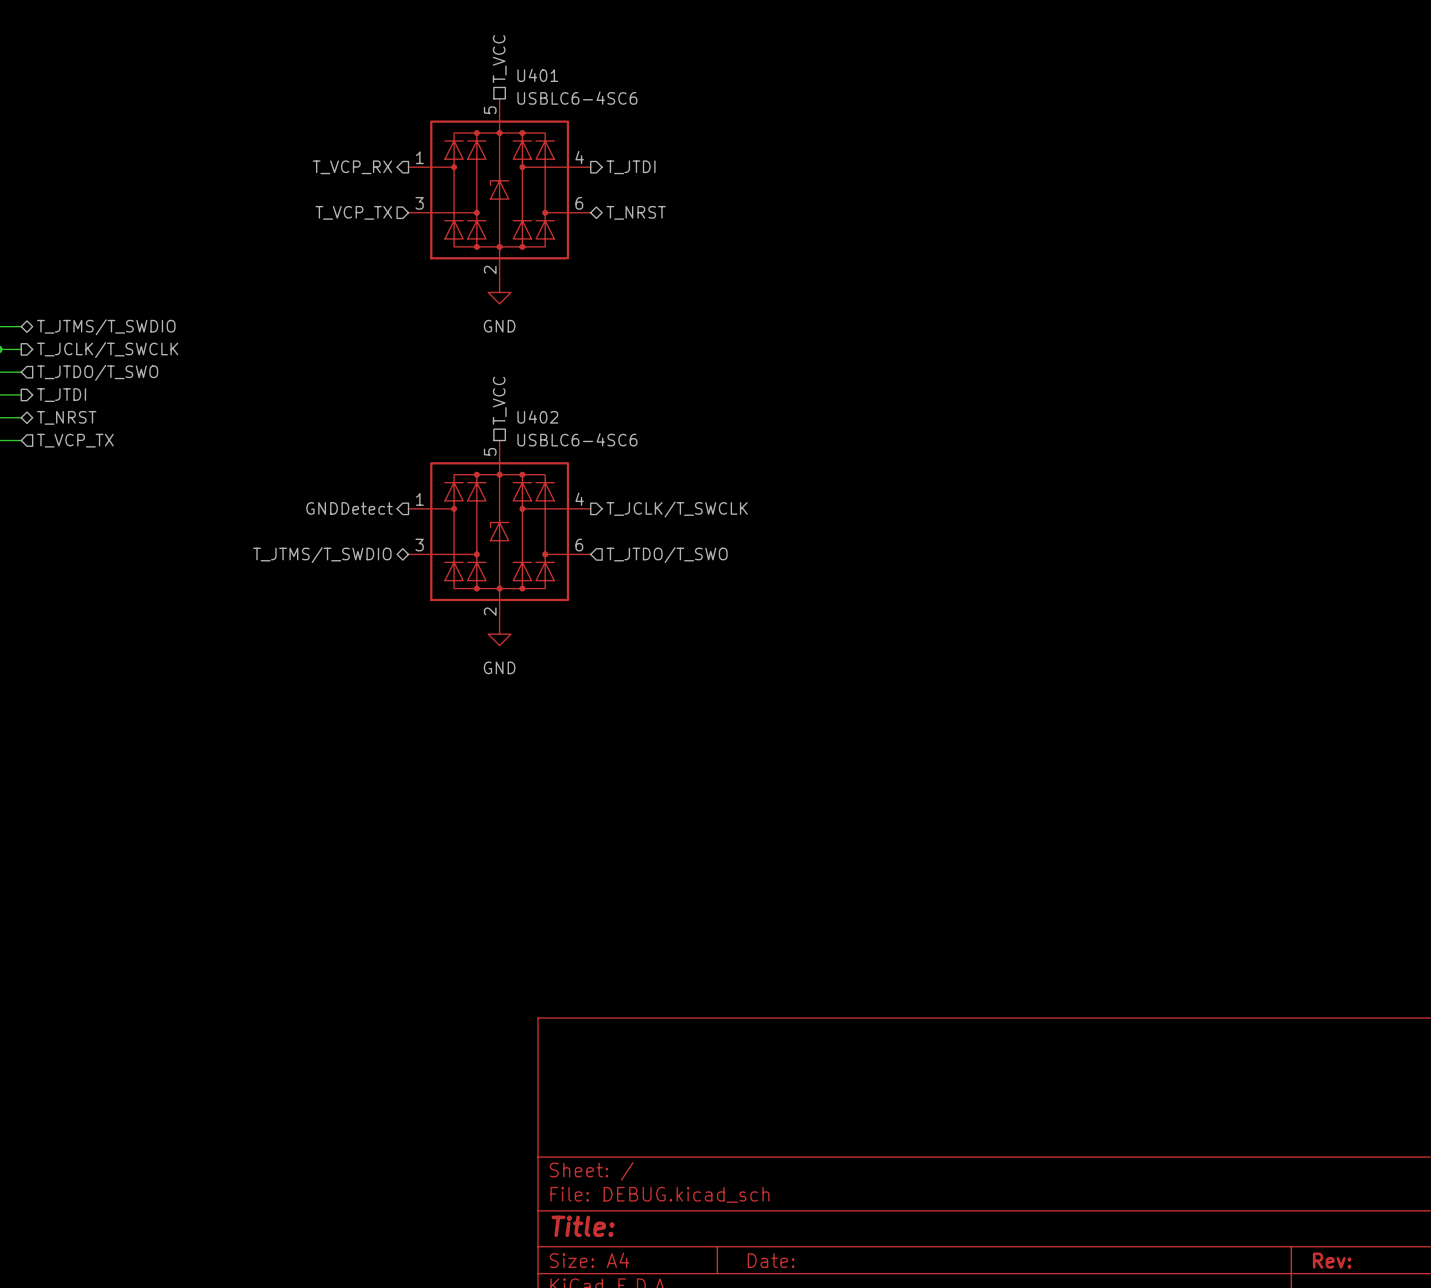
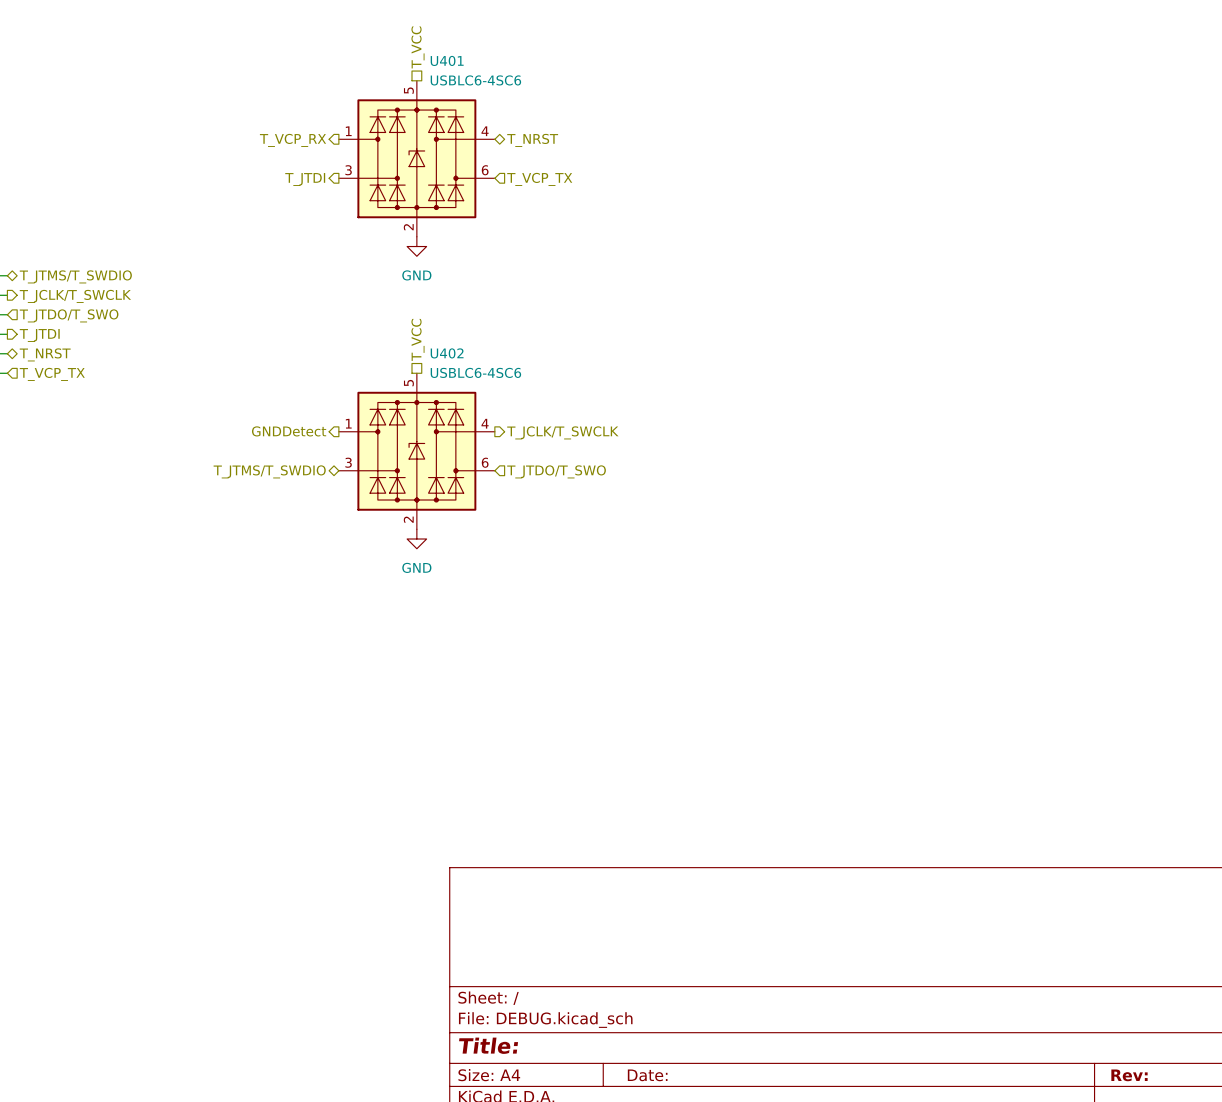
hierarchical label shape: output (631, 167) -> bidirectional (532, 140)
hierarchical label: T_JTDI (631, 167) -> T_NRST (532, 140)
hierarchical label shape: input (353, 212) -> output (305, 179)
hierarchical label: T_VCP_TX (353, 212) -> T_JTDI (305, 179)
hierarchical label shape: bidirectional (636, 212) -> input (539, 179)
hierarchical label: T_NRST (636, 212) -> T_VCP_TX (539, 179)

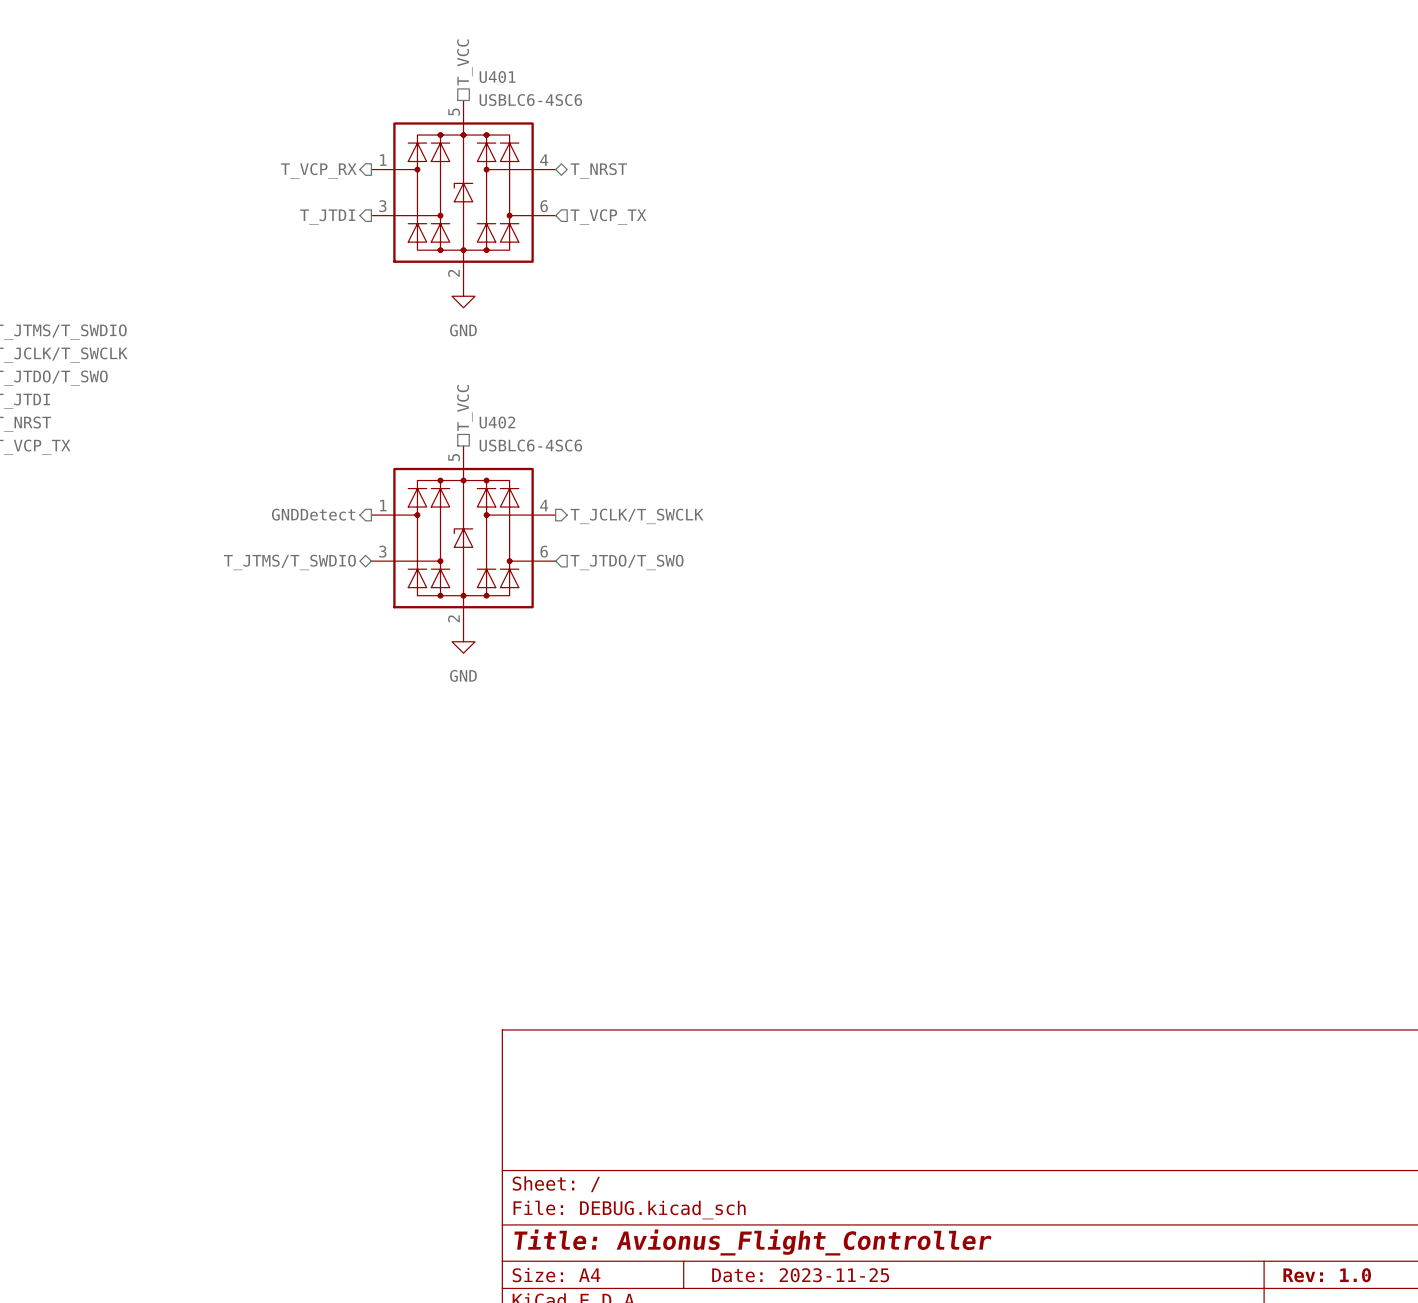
title block: Title: (488, 1045) -> Title: Avionus_Flight_Controller (752, 1242)
title block: Date: (647, 1075) -> Date: 2023-11-25 (800, 1275)
title block: Rev: (1129, 1075) -> Rev: 1.0 (1327, 1275)

